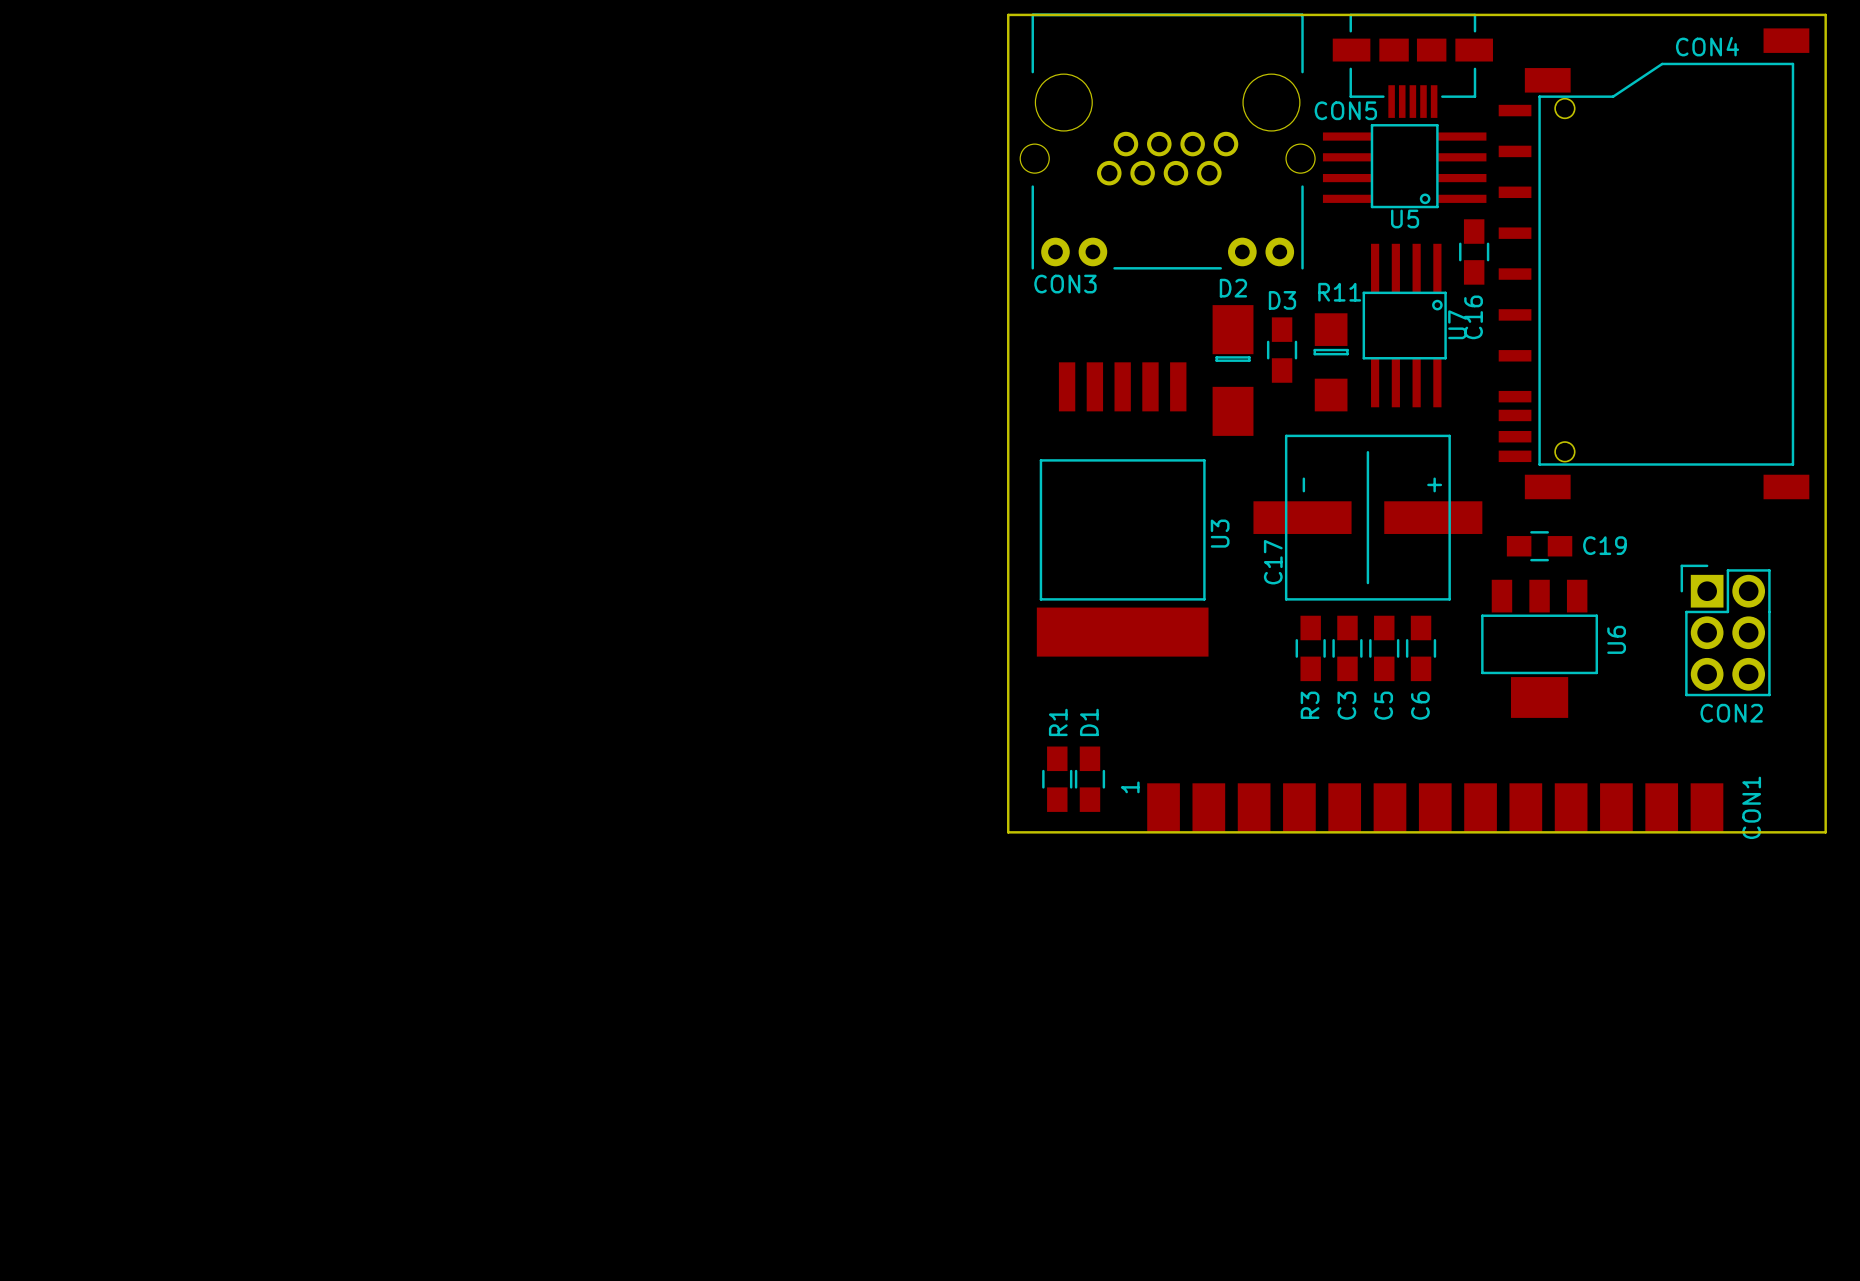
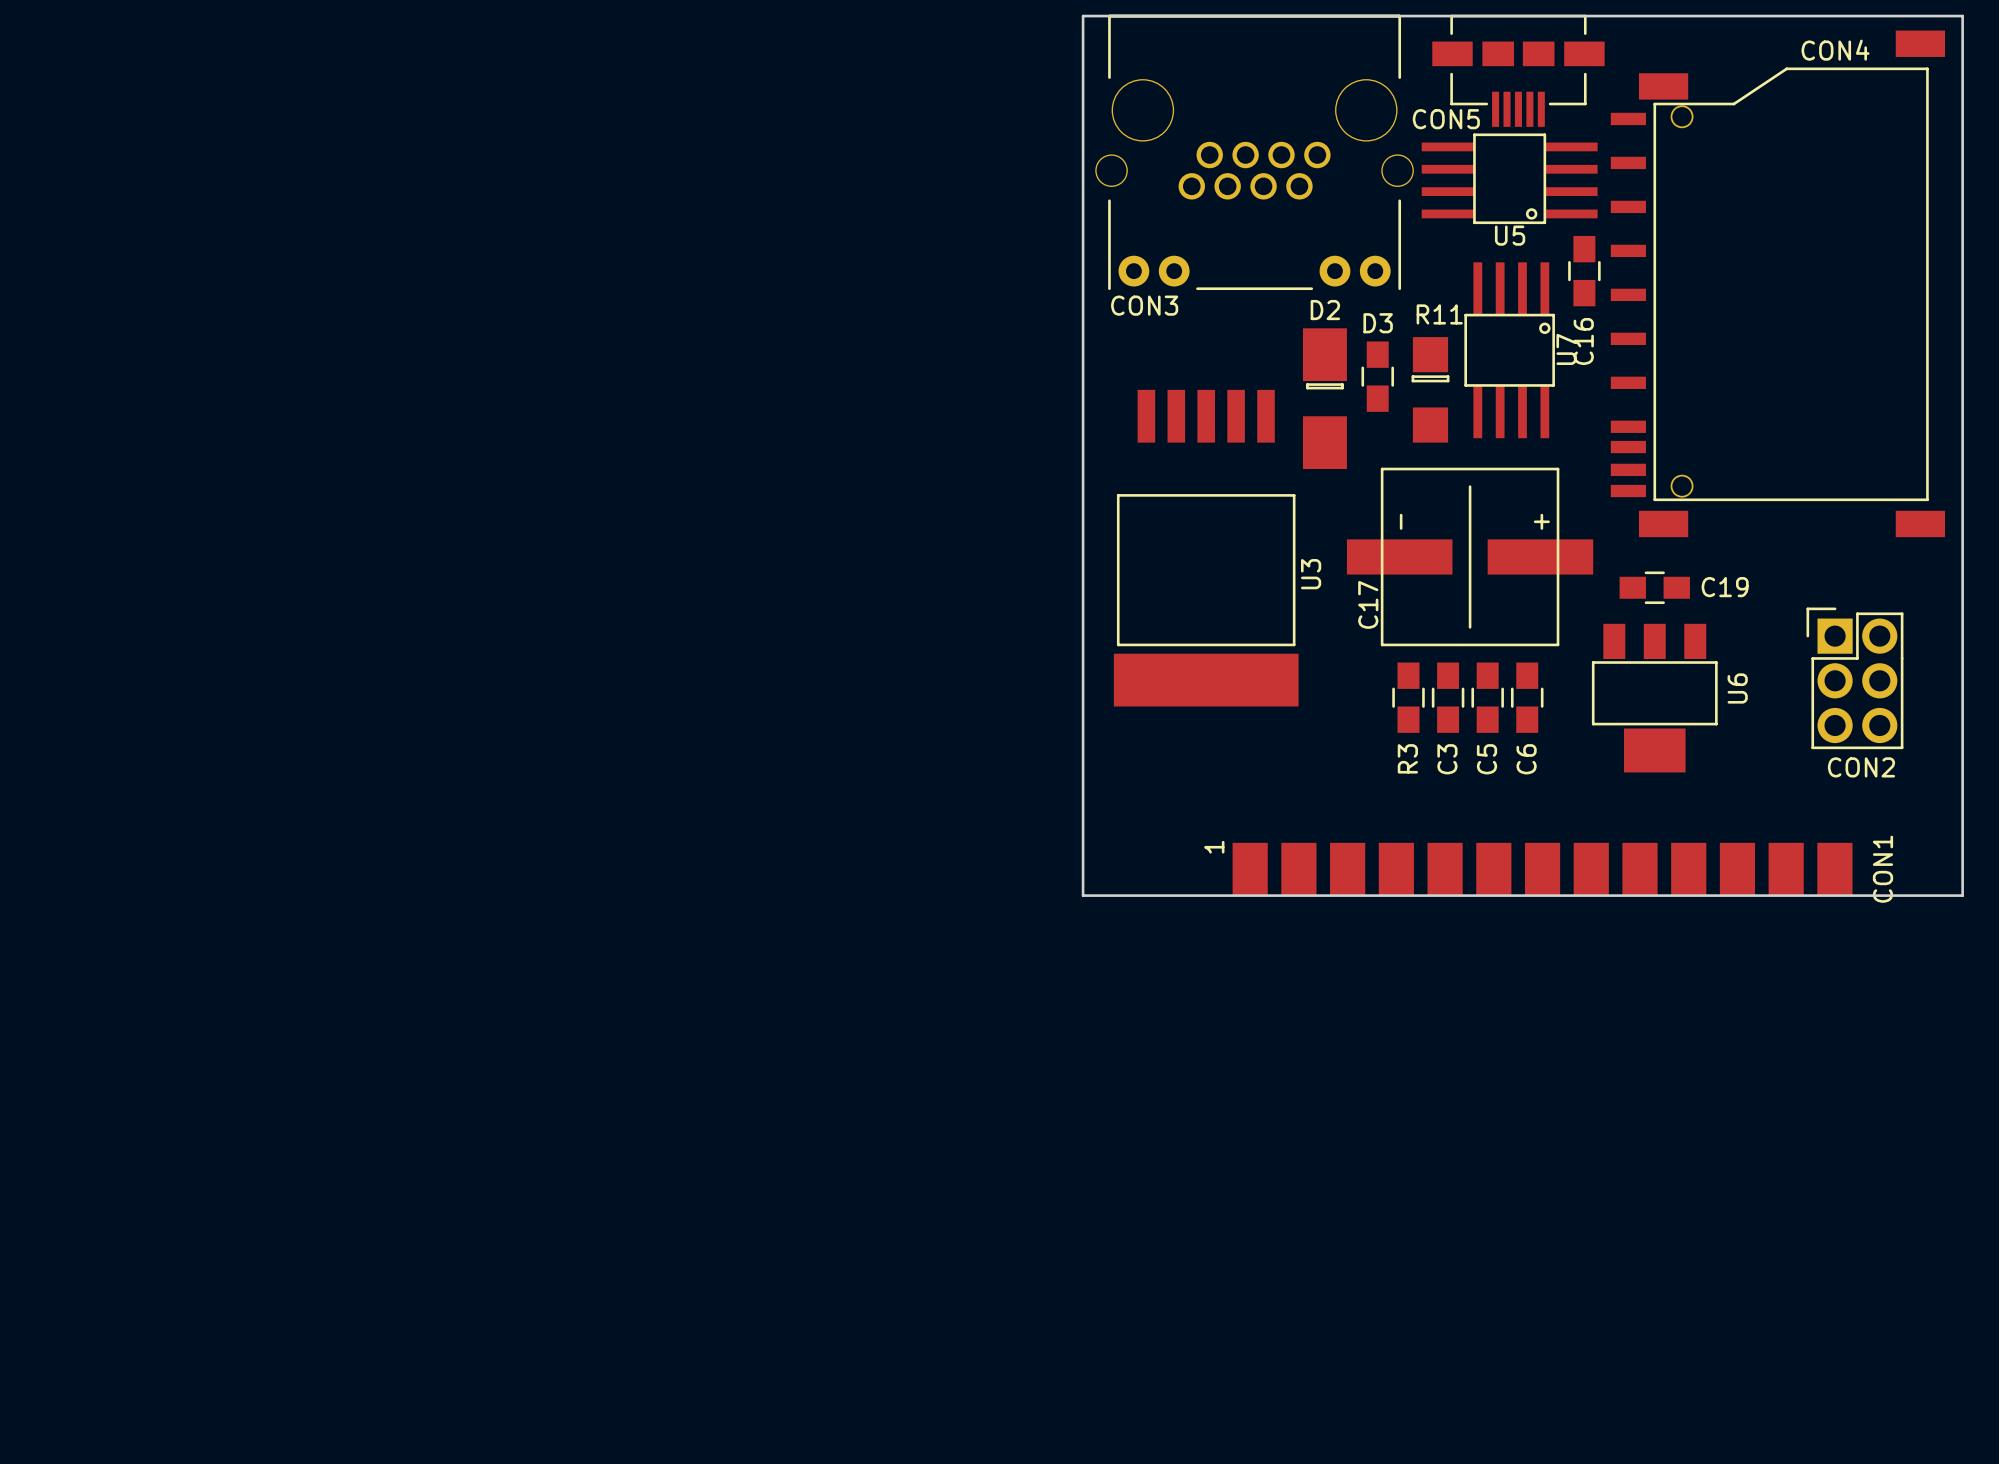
R1: (1057, 779) -> none
D1: (1089, 779) -> none

